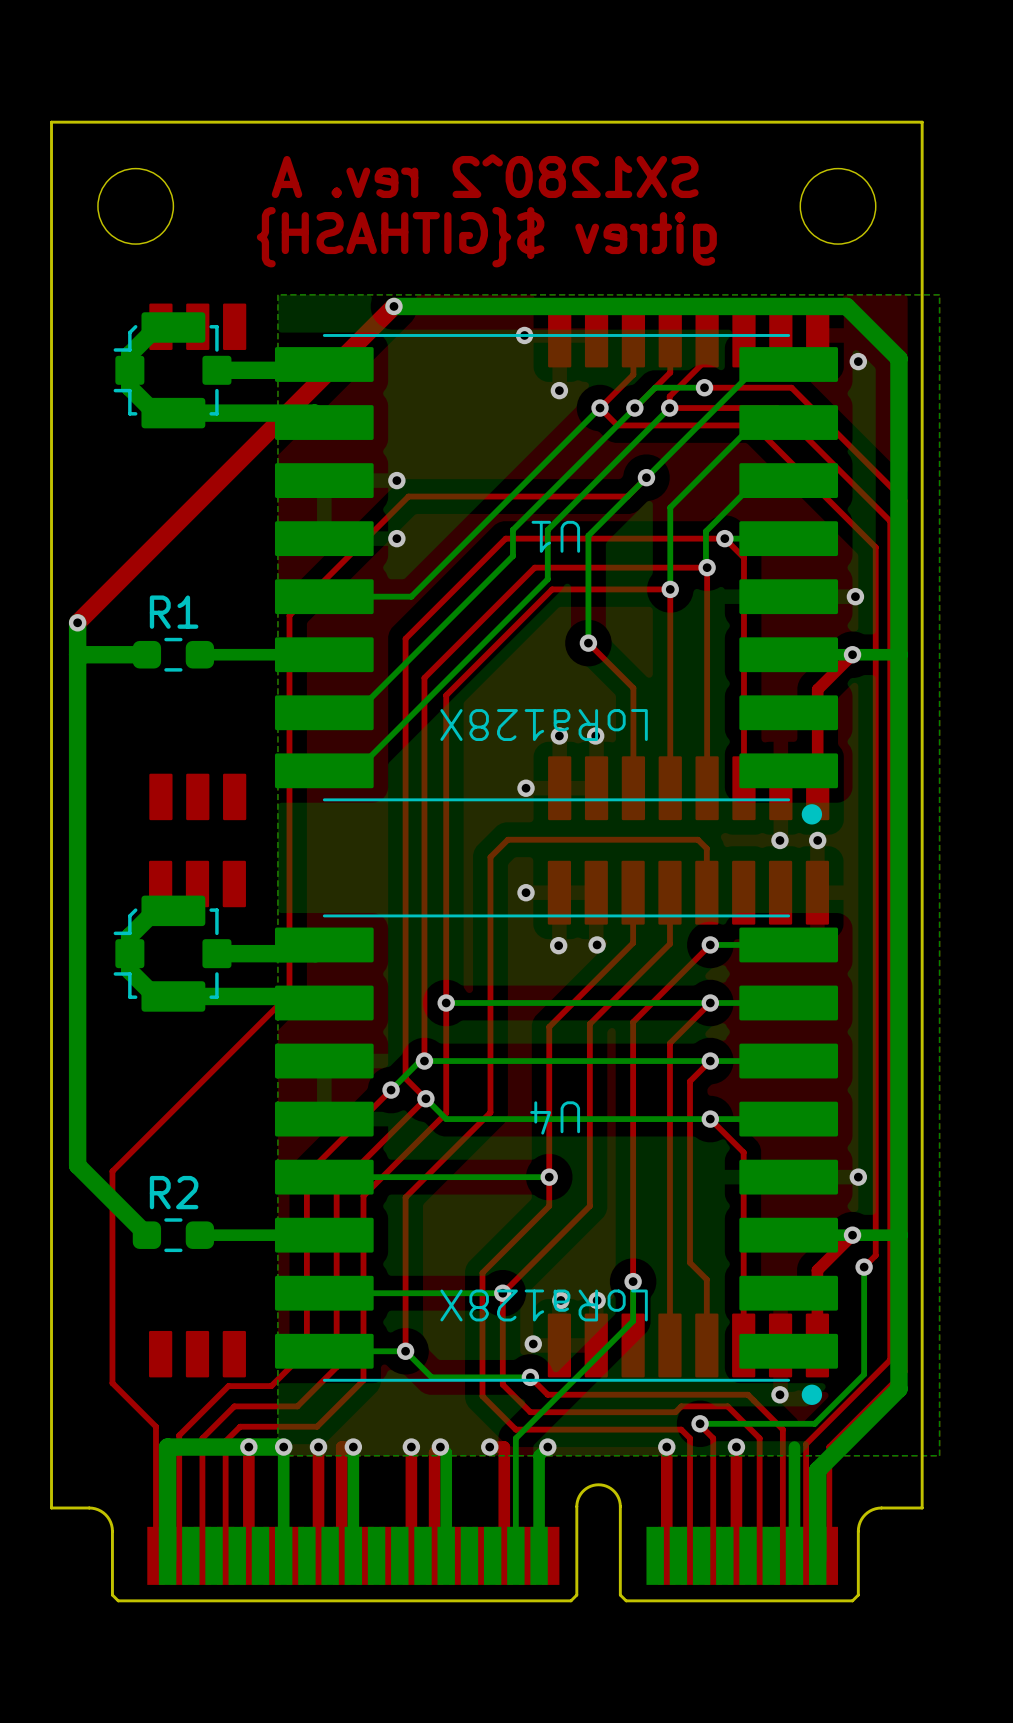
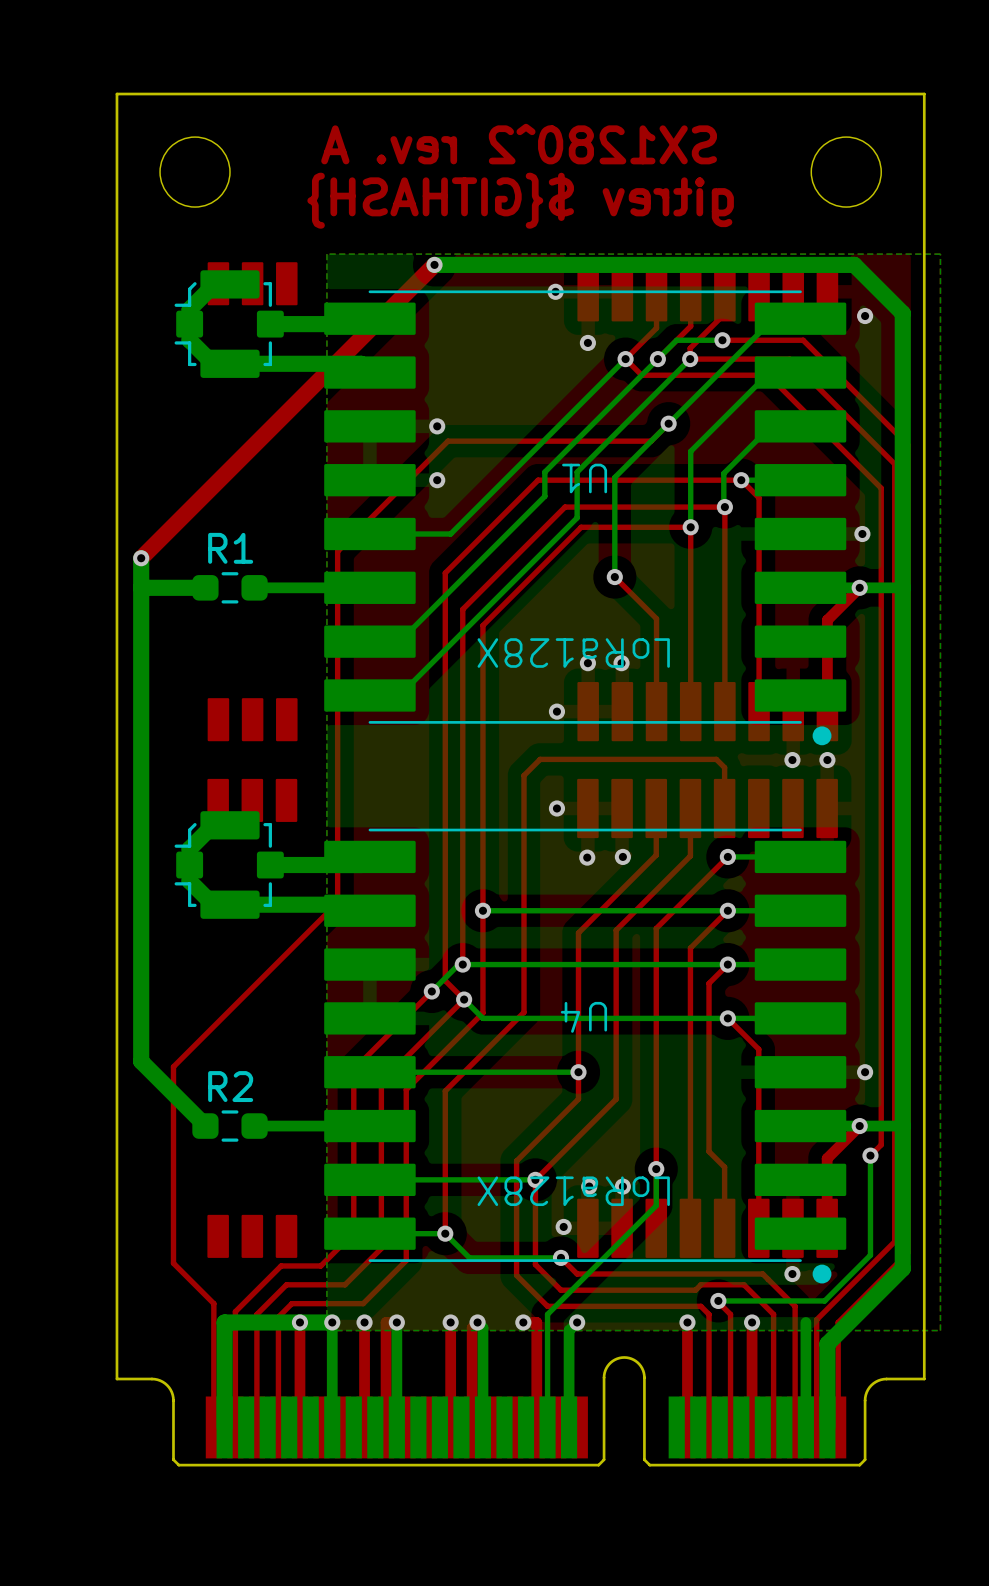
part footprint: [50, 120, 924, 1603] -> [115, 92, 926, 1467]

